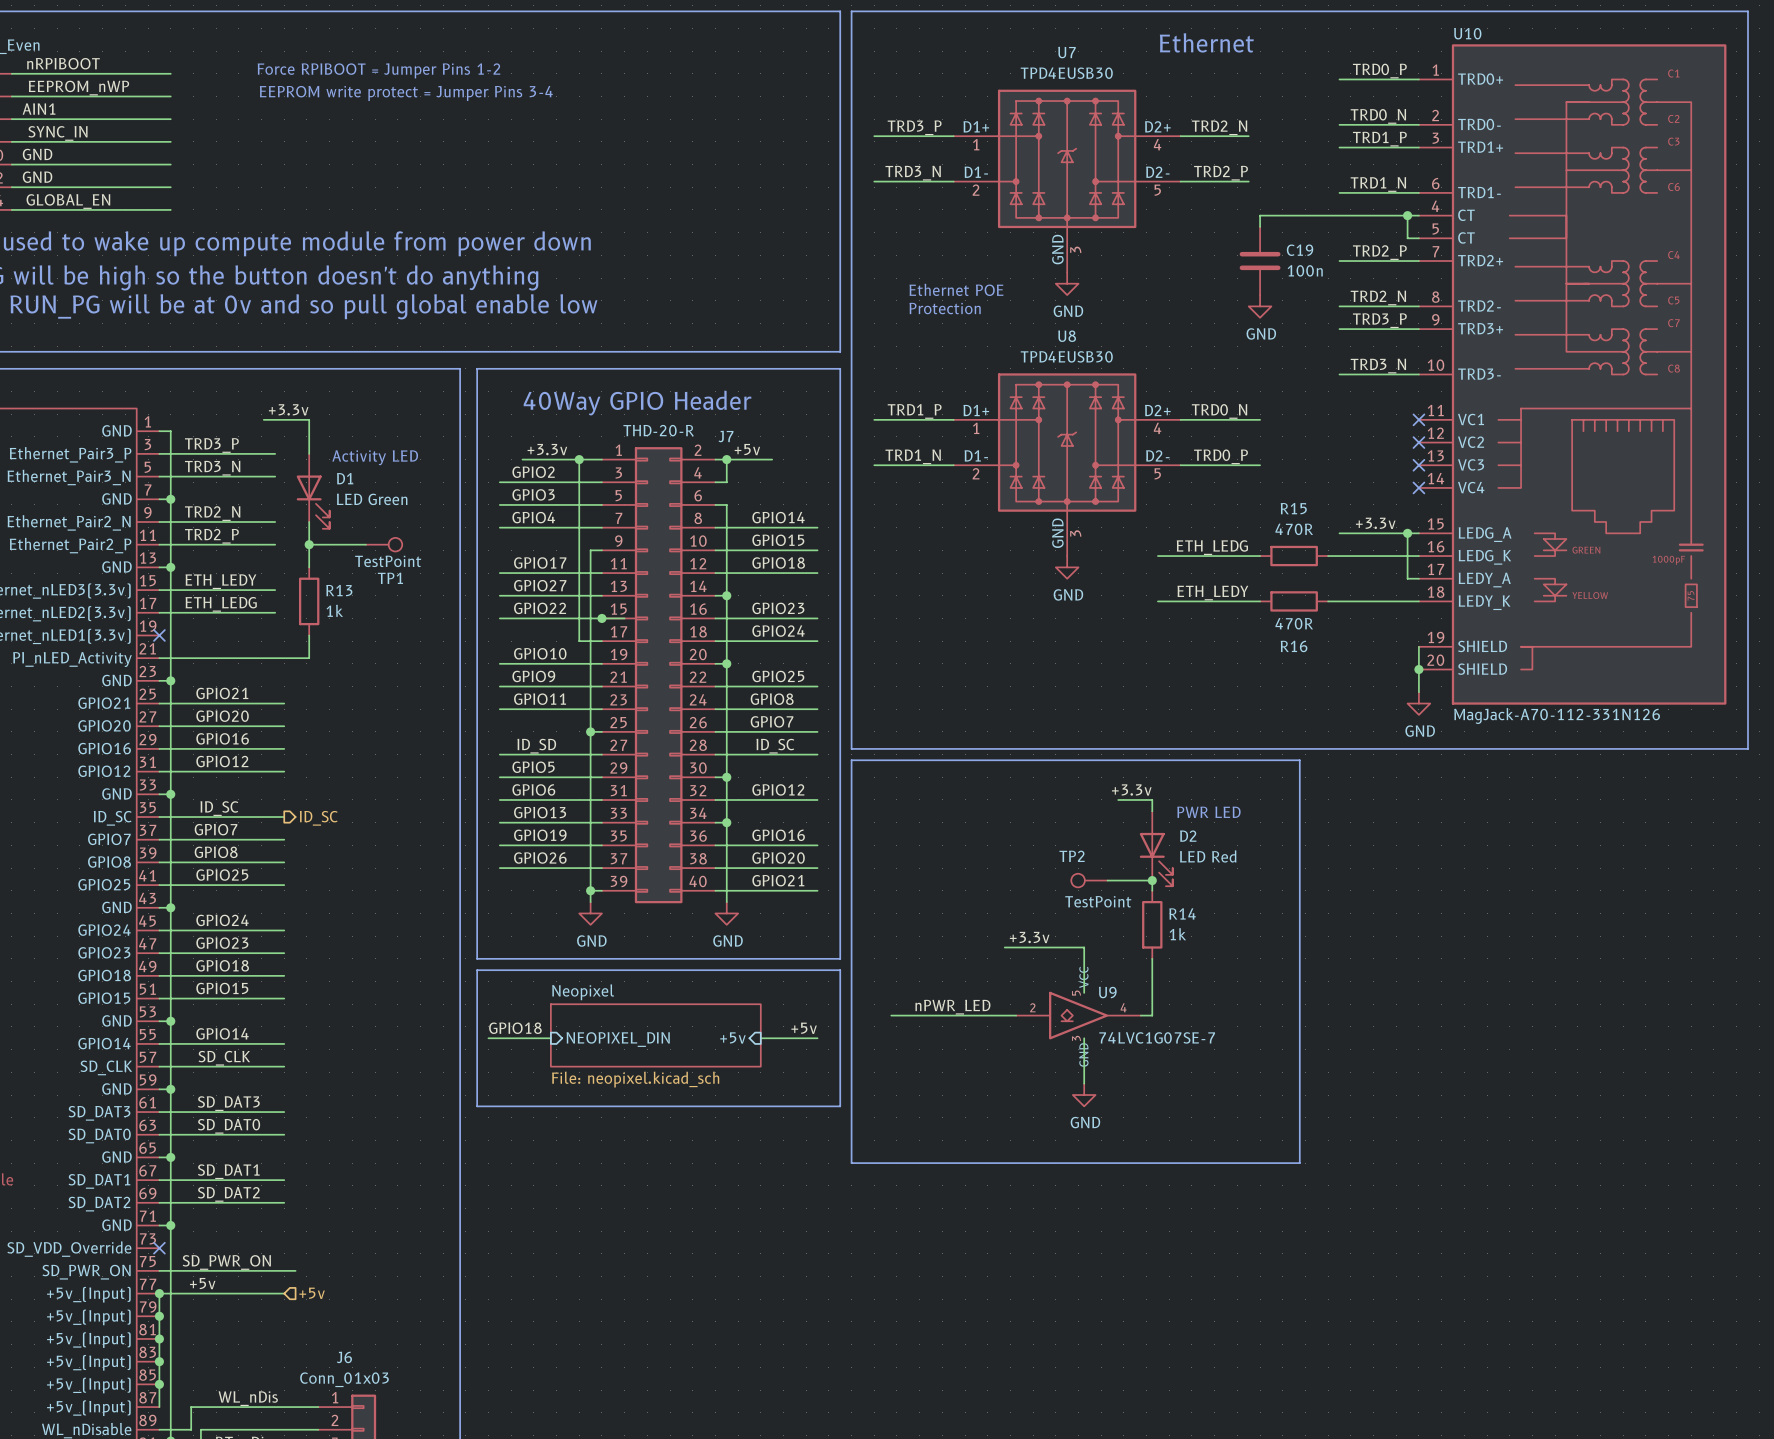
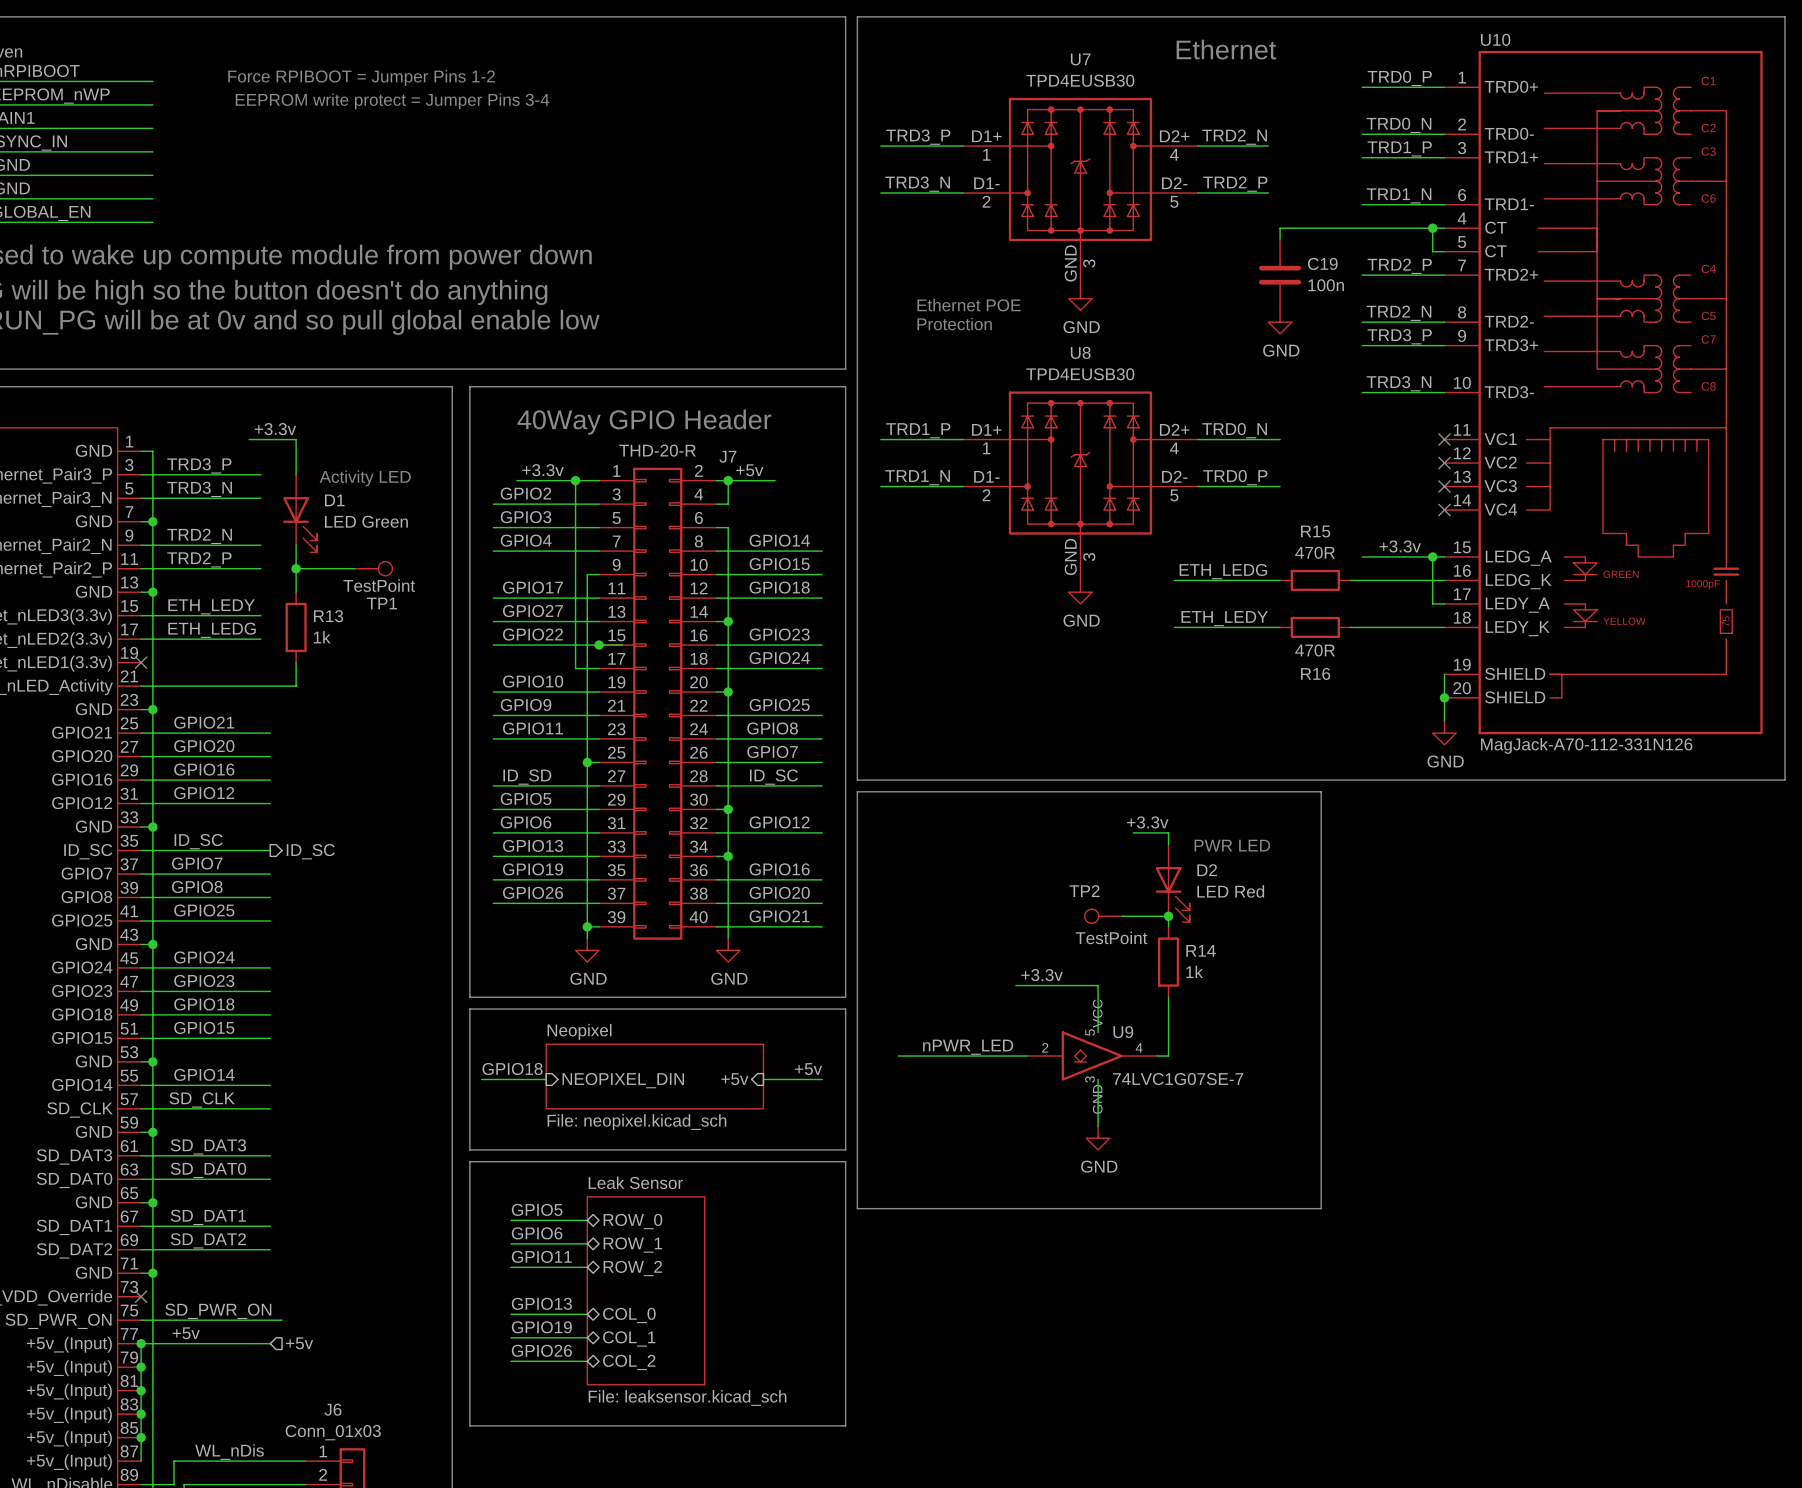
line: none -> (469, 1161) (845, 1161) (845, 1425) (469, 1425) (469, 1161)
label: none -> GPIO5 (537, 1209)
wire: none -> (510, 1220) (587, 1220)
sheet pin: none -> ROW_0 (632, 1221)
label: none -> GPIO6 (537, 1233)
wire: none -> (510, 1243) (587, 1243)
sheet pin: none -> ROW_1 (632, 1245)
label: none -> GPIO11 (541, 1256)
wire: none -> (510, 1267) (587, 1267)
sheet pin: none -> ROW_2 (632, 1268)
sheet Leak Sensor: none -> File: leaksensor.kicad_sch (646, 1290)
label: none -> GPIO13 (541, 1303)
wire: none -> (510, 1314) (587, 1314)
sheet pin: none -> COL_0 (629, 1315)
label: none -> GPIO19 (541, 1327)
wire: none -> (510, 1337) (587, 1337)
sheet pin: none -> COL_1 (629, 1338)
label: none -> GPIO26 (541, 1350)
wire: none -> (510, 1361) (587, 1361)
sheet pin: none -> COL_2 (629, 1362)

